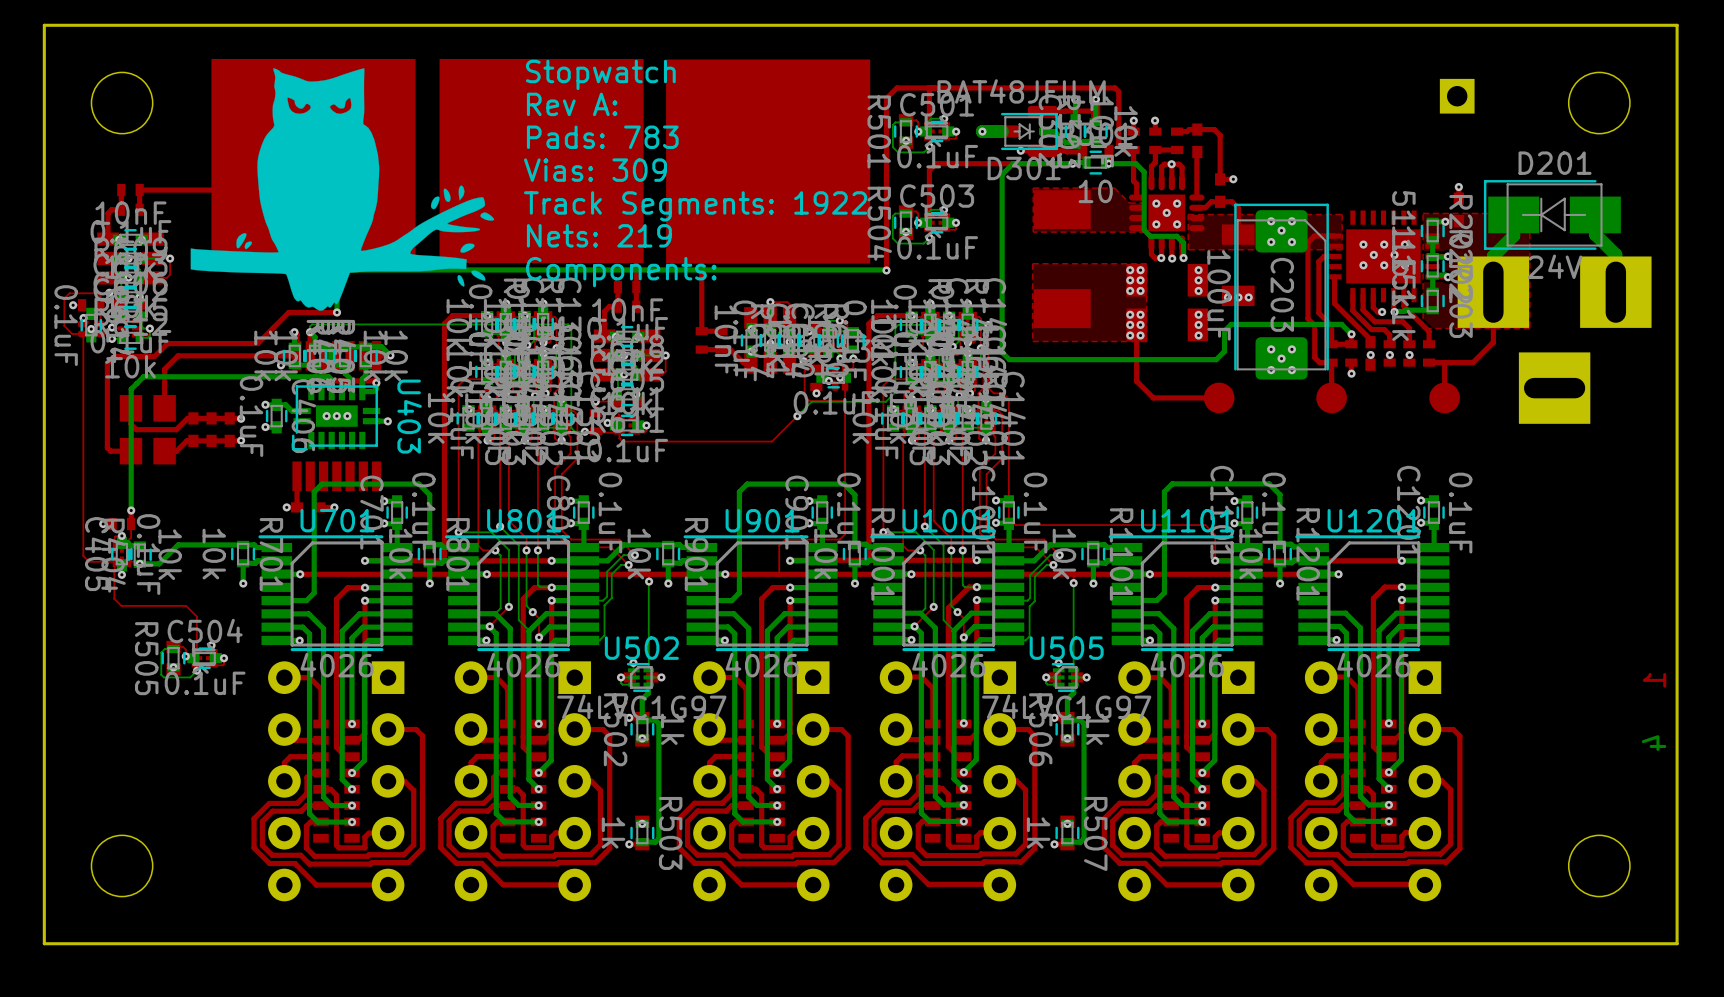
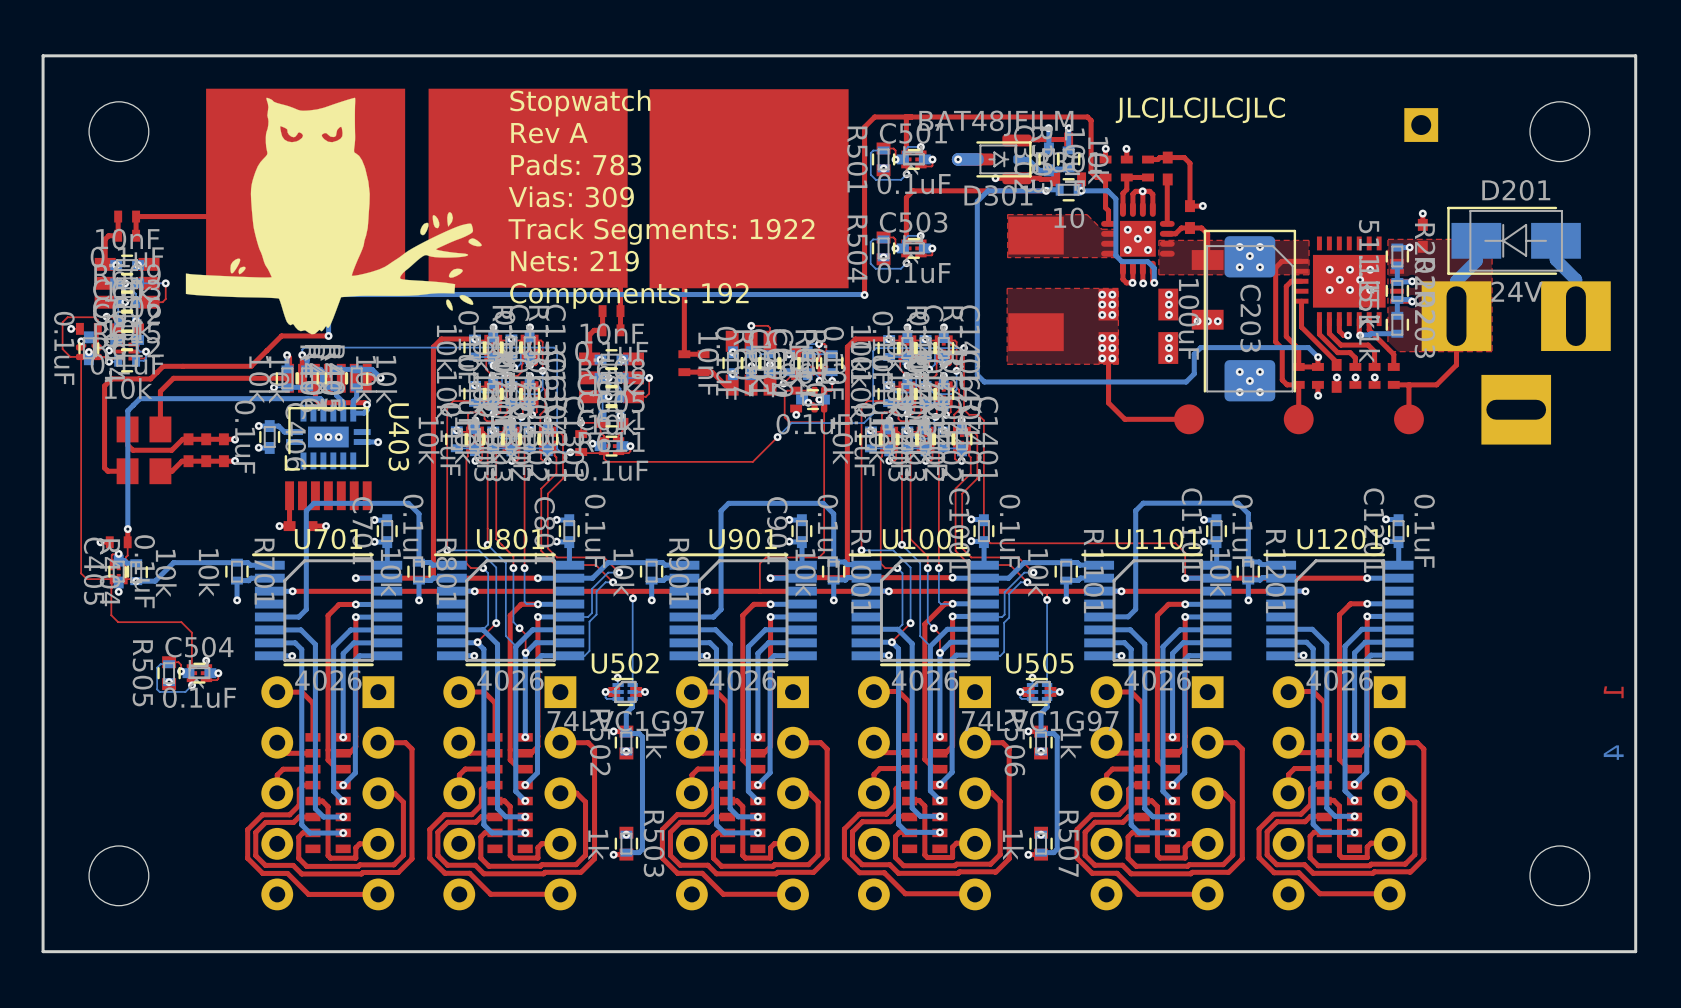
text: none -> JLCJLCJLCJLC (1200, 110)
text: Rev A: (572, 104) -> Rev A (549, 133)
text: Components: (621, 272) -> Components: 192 (629, 295)

